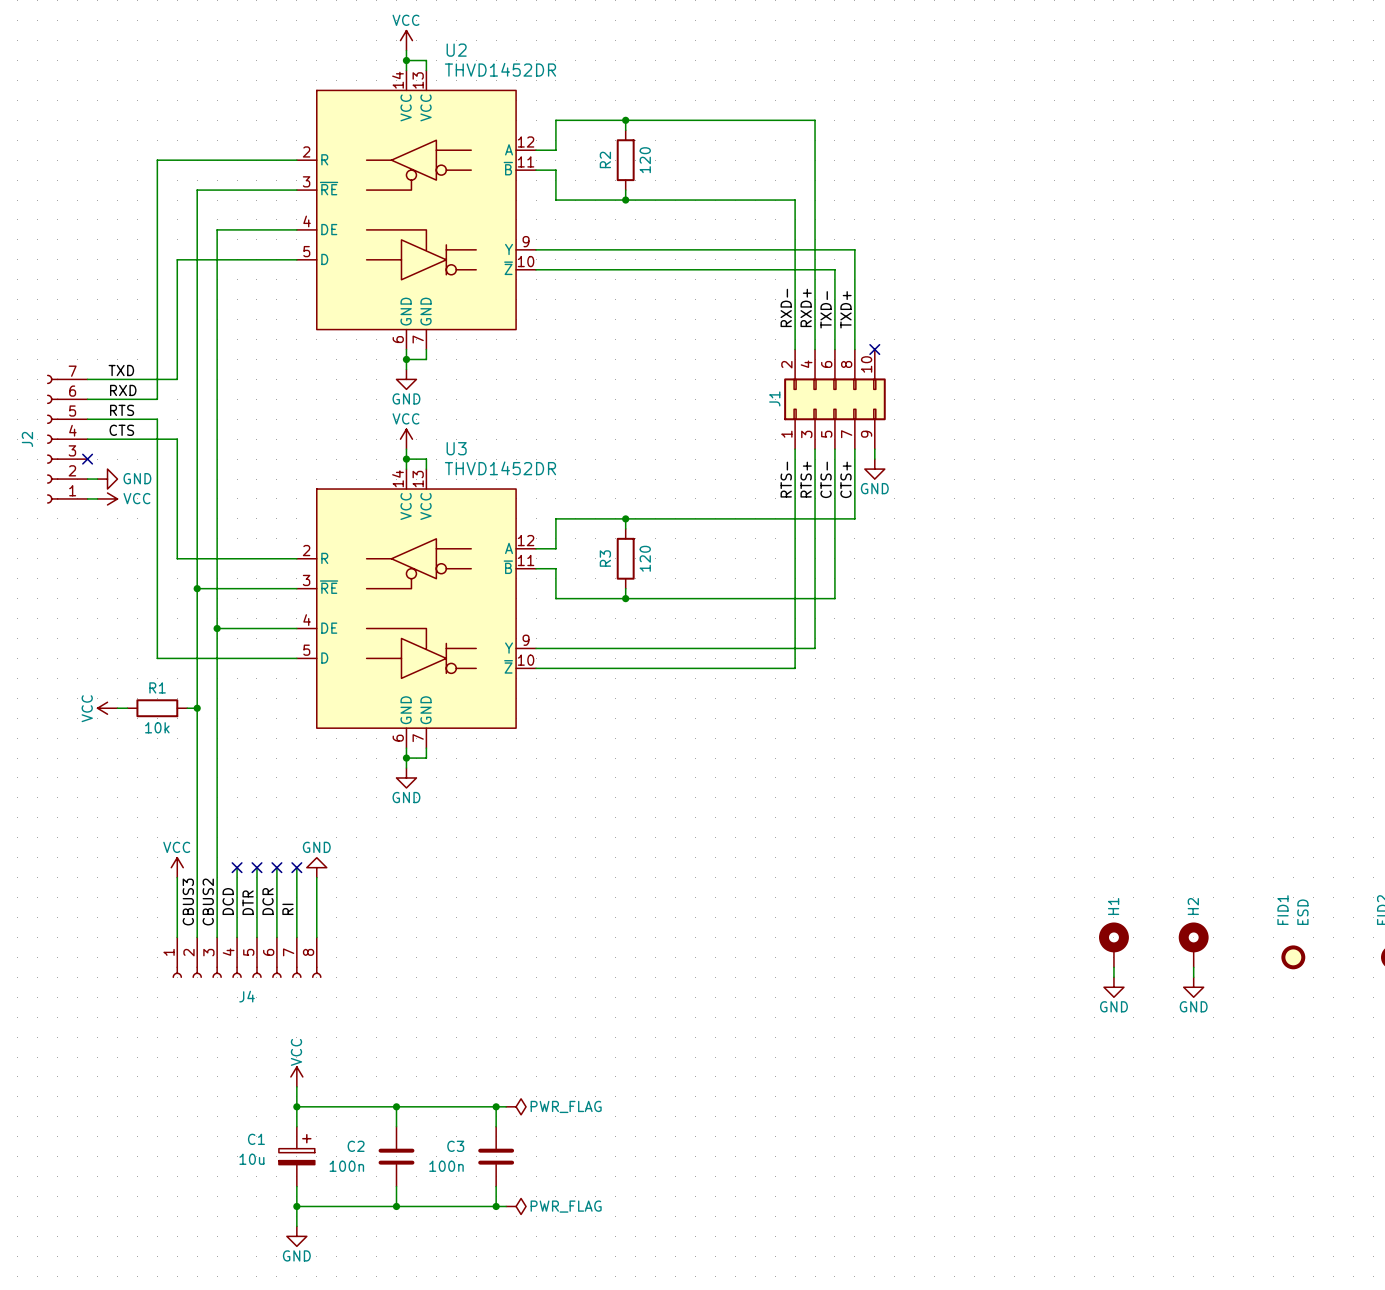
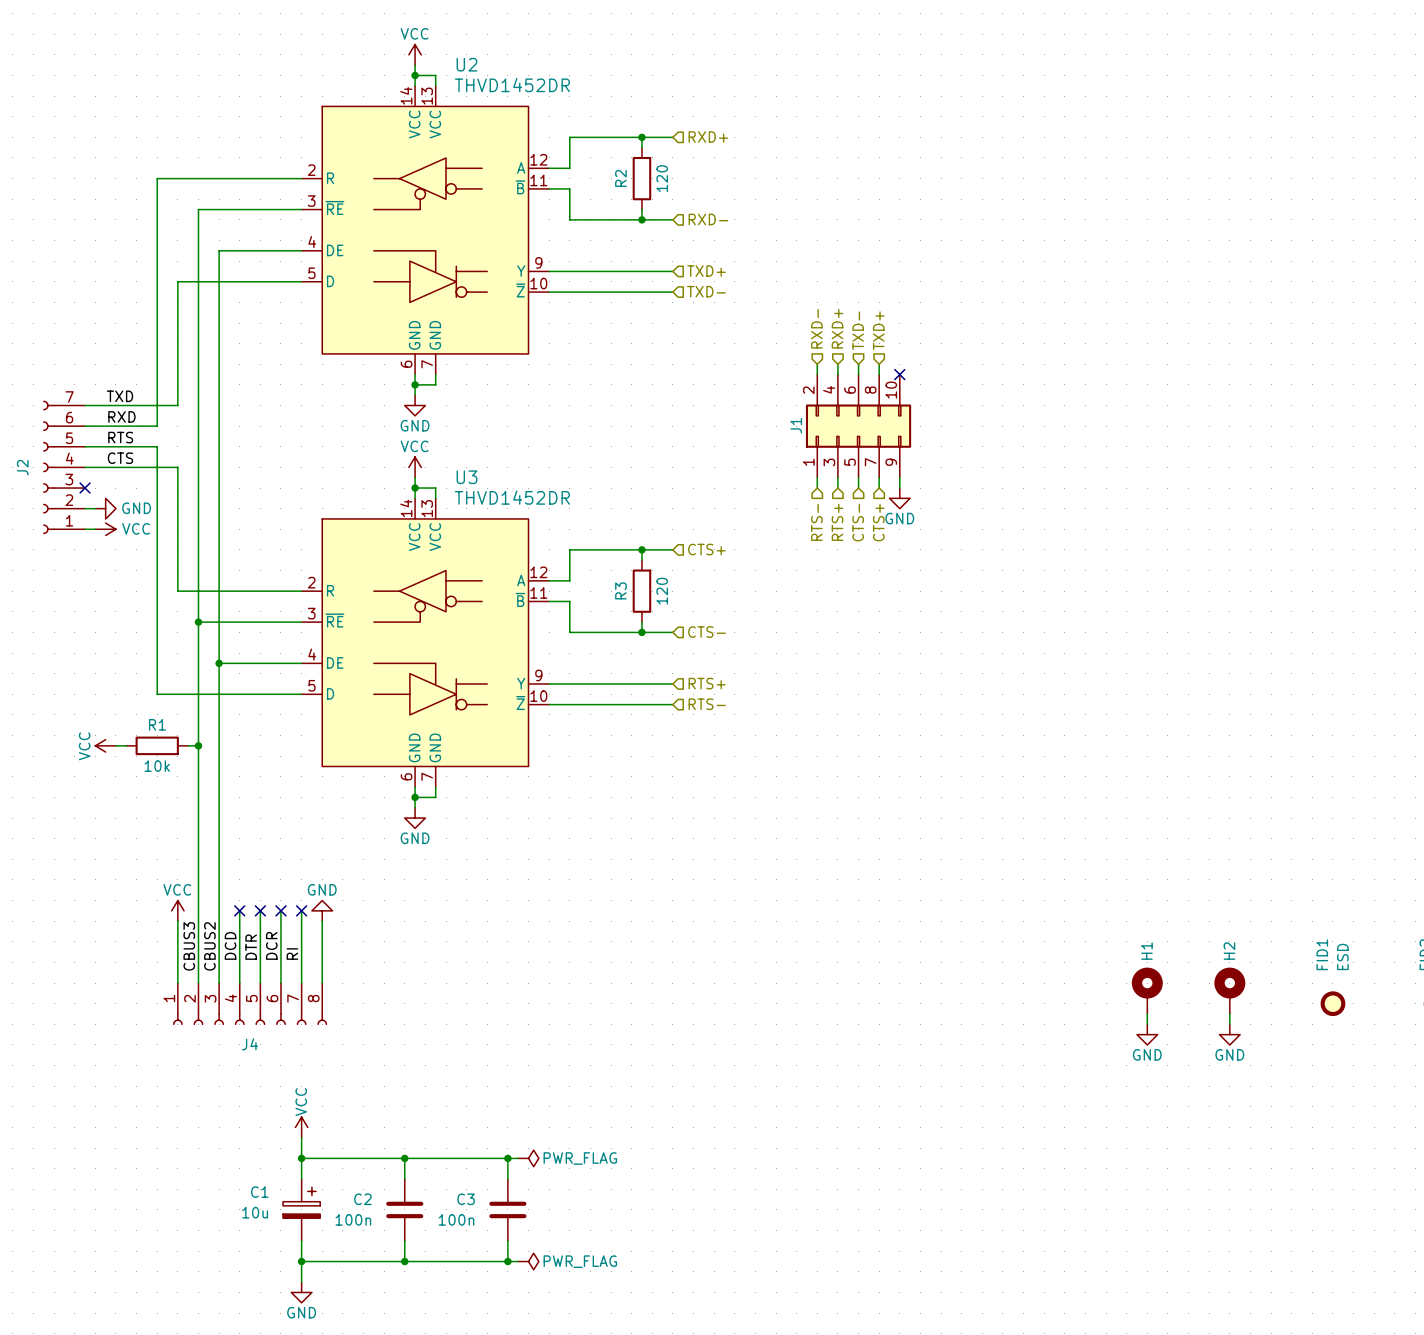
hierarchical label: none -> RXD+ (708, 136)
wire: (655, 120) (815, 120) (815, 339) -> none
hierarchical label: none -> RXD- (708, 219)
wire: (655, 200) (795, 200) (795, 339) -> none
wire: (655, 249) (854, 249) (854, 339) -> none
hierarchical label: none -> TXD+ (706, 271)
wire: (655, 269) (834, 269) (834, 339) -> none
hierarchical label: none -> TXD- (706, 291)
hierarchical label: none -> RXD- (816, 328)
hierarchical label: none -> RXD+ (837, 328)
label: RXD- (786, 307) -> none
label: RXD+ (806, 307) -> none
hierarchical label: none -> TXD- (858, 330)
hierarchical label: none -> TXD+ (878, 330)
label: TXD- (826, 309) -> none
label: TXD+ (845, 309) -> none
wire: (795, 459) (795, 668) (655, 668) -> none
wire: (815, 459) (815, 648) (655, 648) -> none
wire: (834, 459) (834, 598) (655, 598) -> none
wire: (854, 459) (854, 518) (655, 518) -> none
label: RTS- (786, 479) -> none
label: RTS+ (806, 479) -> none
label: CTS- (826, 479) -> none
label: CTS+ (845, 479) -> none
hierarchical label: none -> RTS- (816, 522)
hierarchical label: none -> RTS+ (837, 522)
hierarchical label: none -> CTS- (858, 522)
hierarchical label: none -> CTS+ (878, 522)
hierarchical label: none -> CTS+ (706, 549)
hierarchical label: none -> CTS- (706, 632)
hierarchical label: none -> RTS+ (707, 683)
hierarchical label: none -> RTS- (707, 704)

